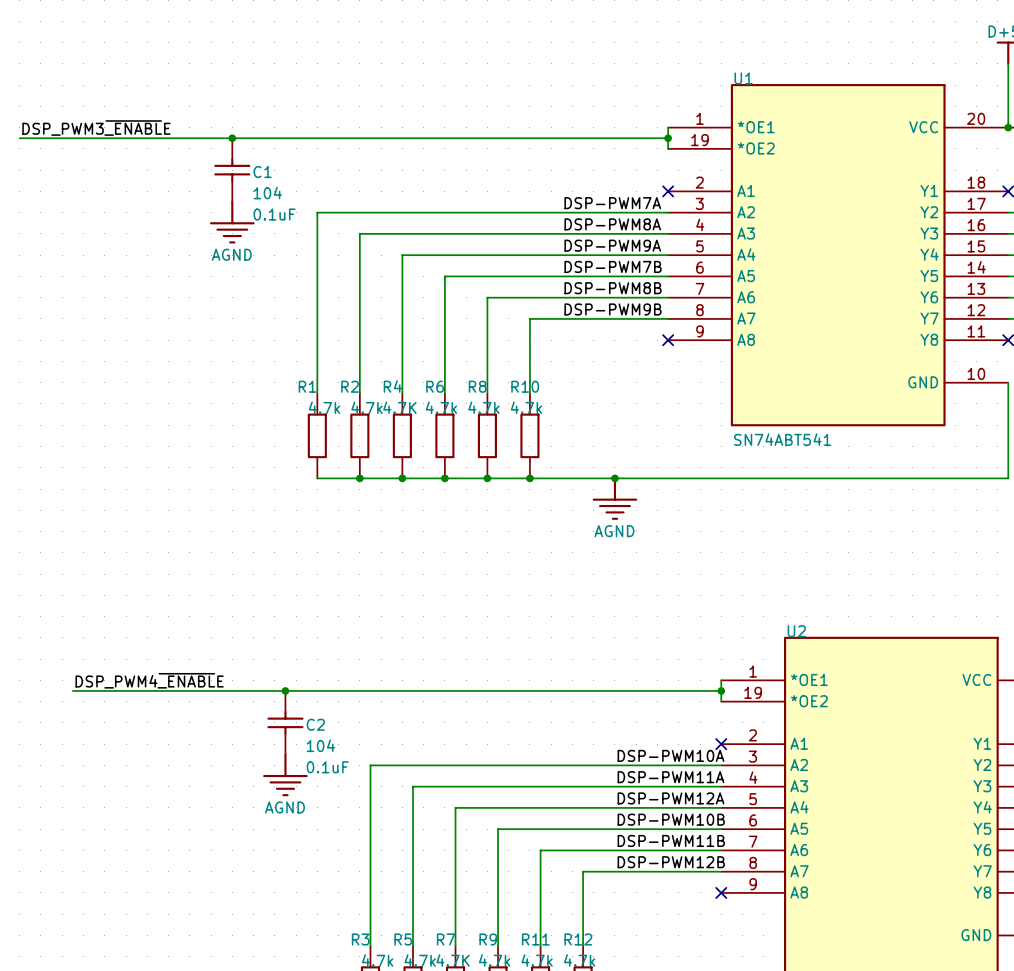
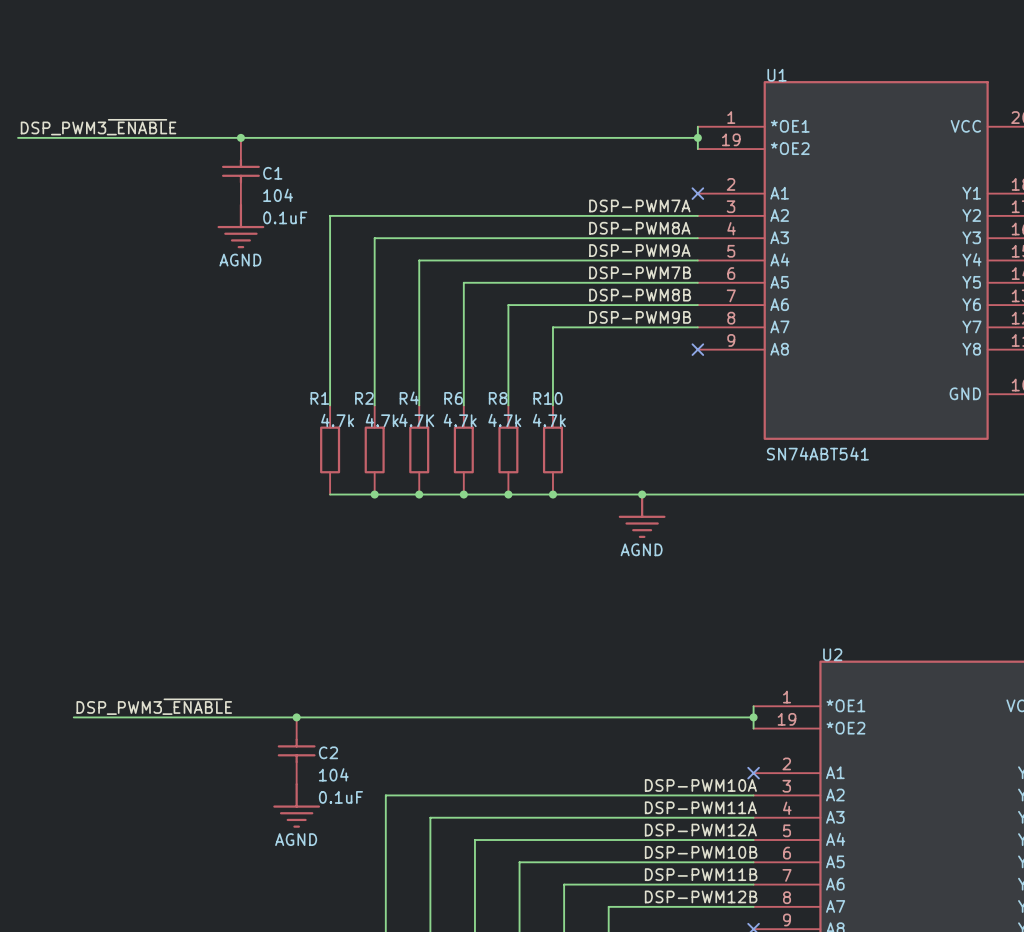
label: DSP_PWM4~{_ENABL}E (149, 680) -> DSP_PWM3~{_ENABL}E (154, 706)

